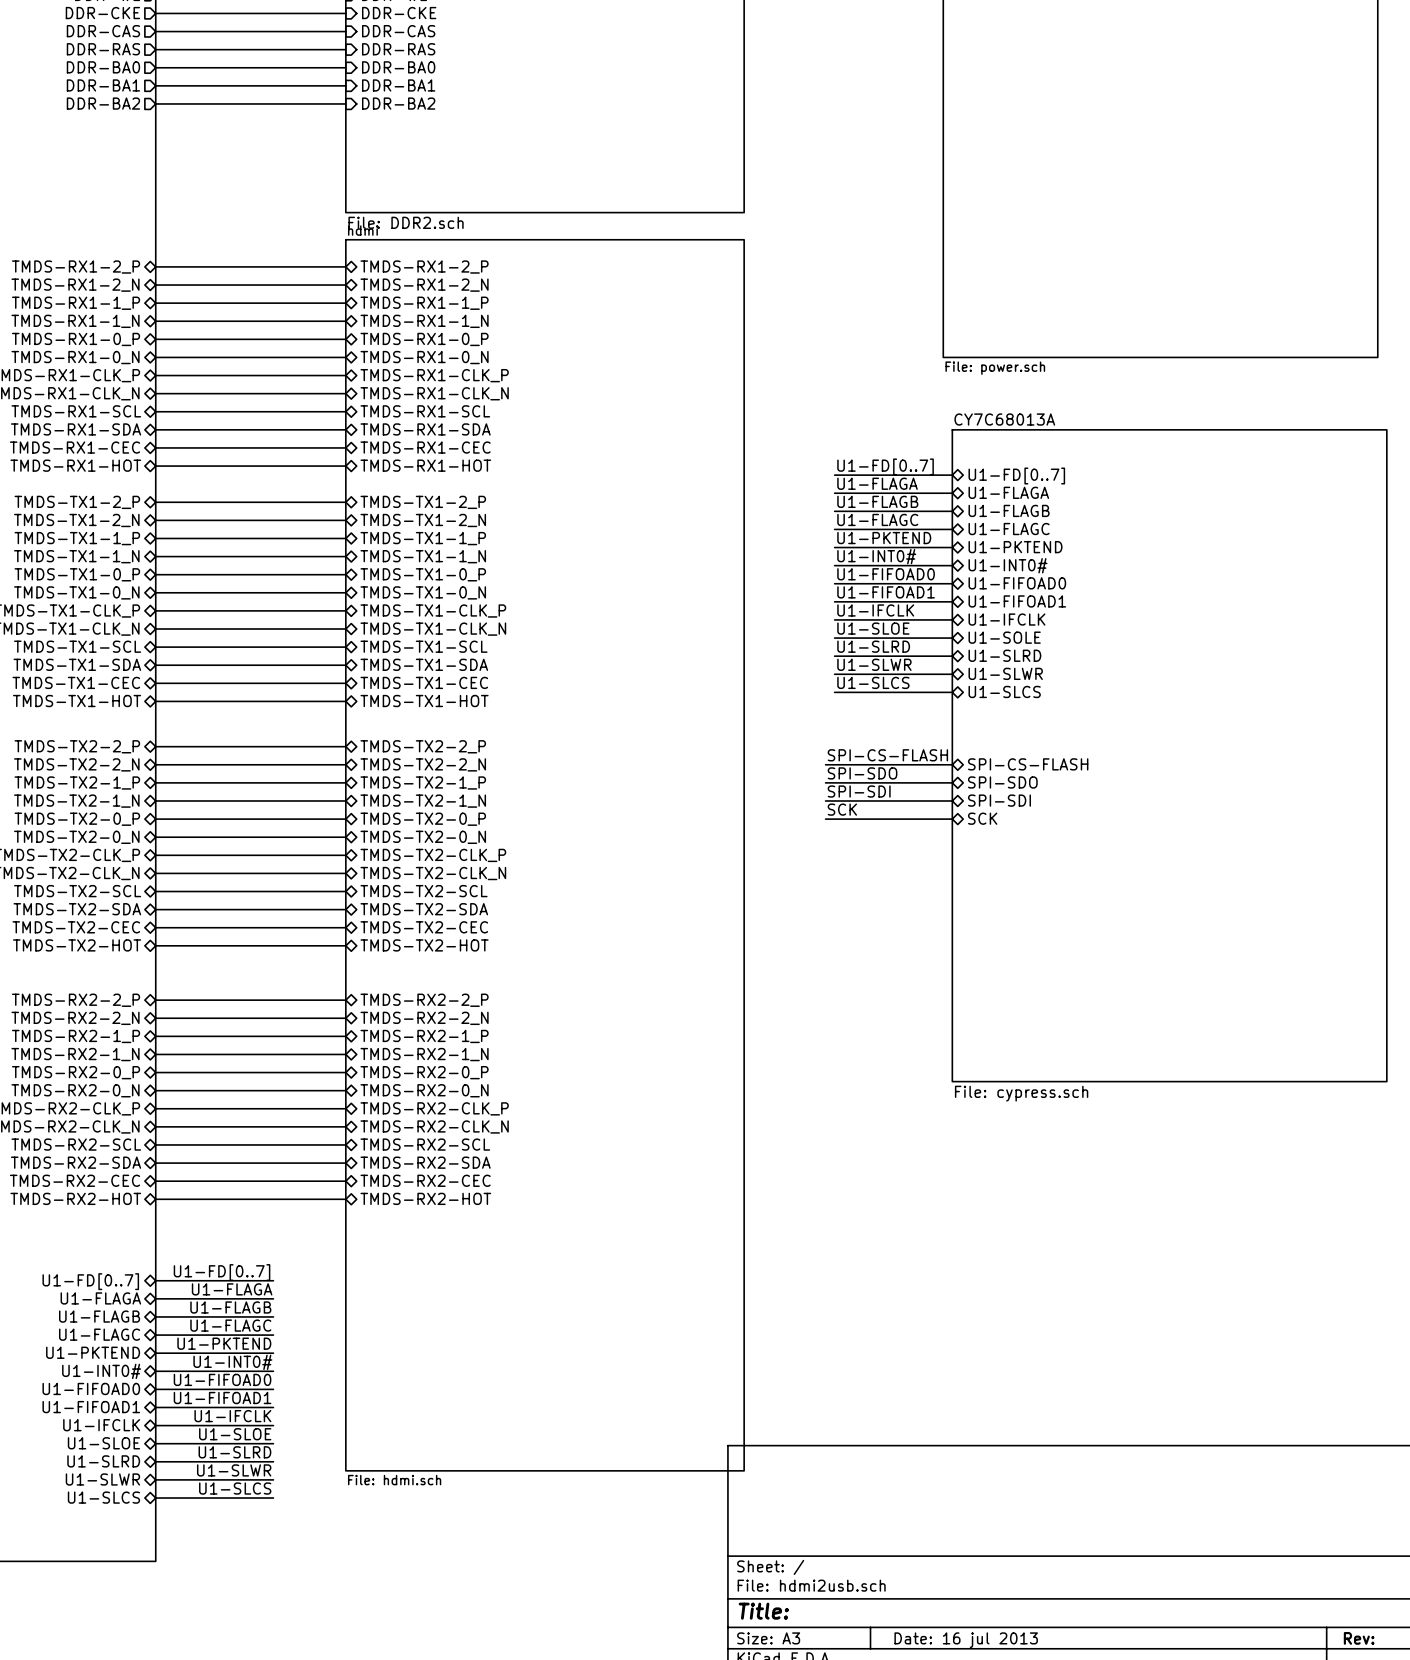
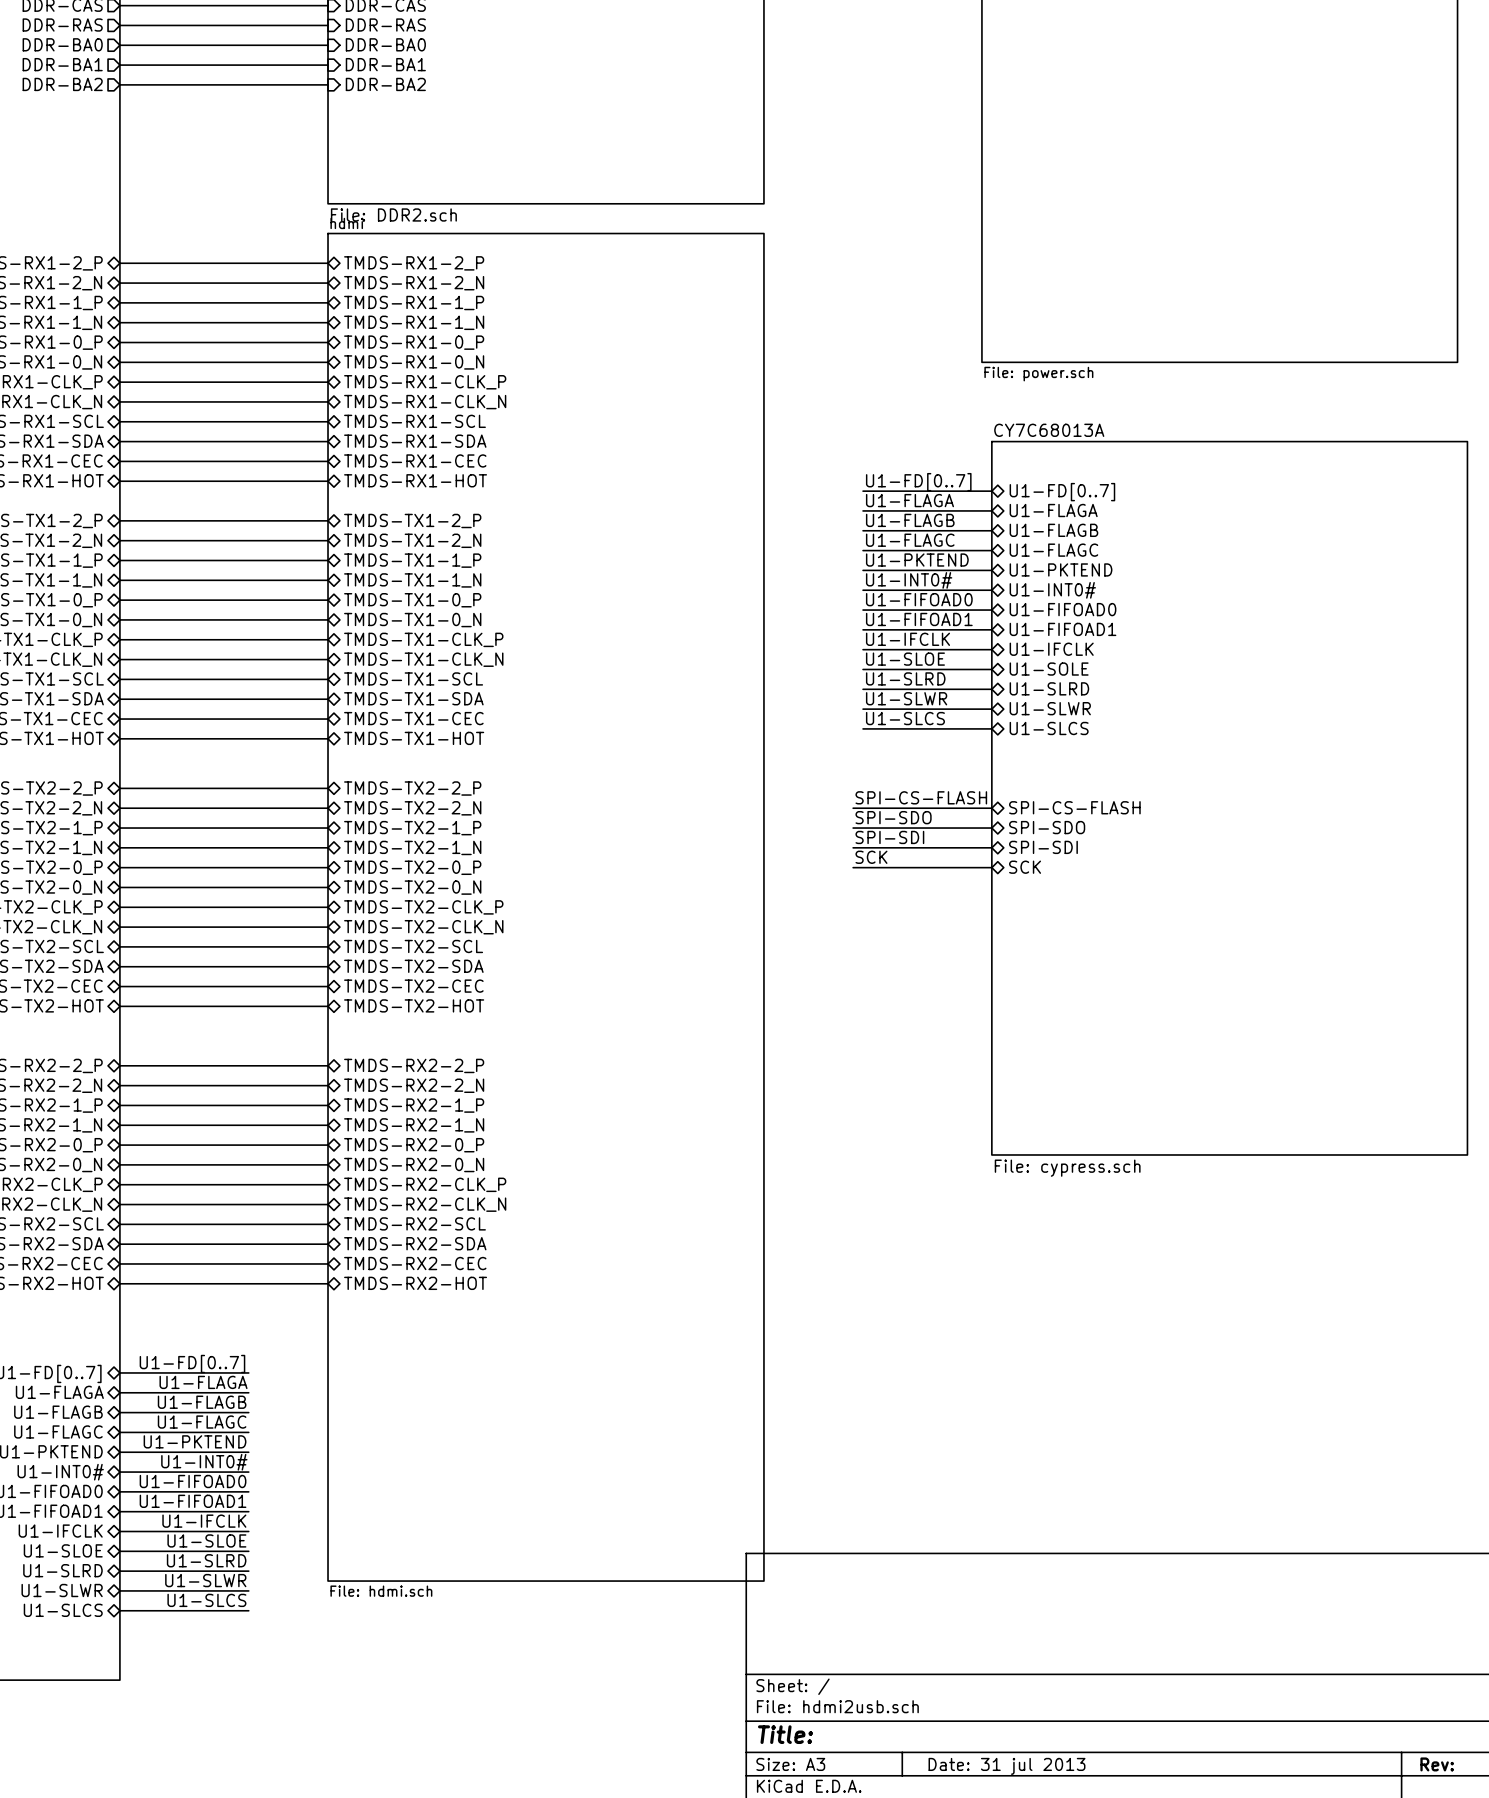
title block: Date: 16 jul 2013 (966, 1640) -> Date: 31 jul 2013 (1007, 1766)

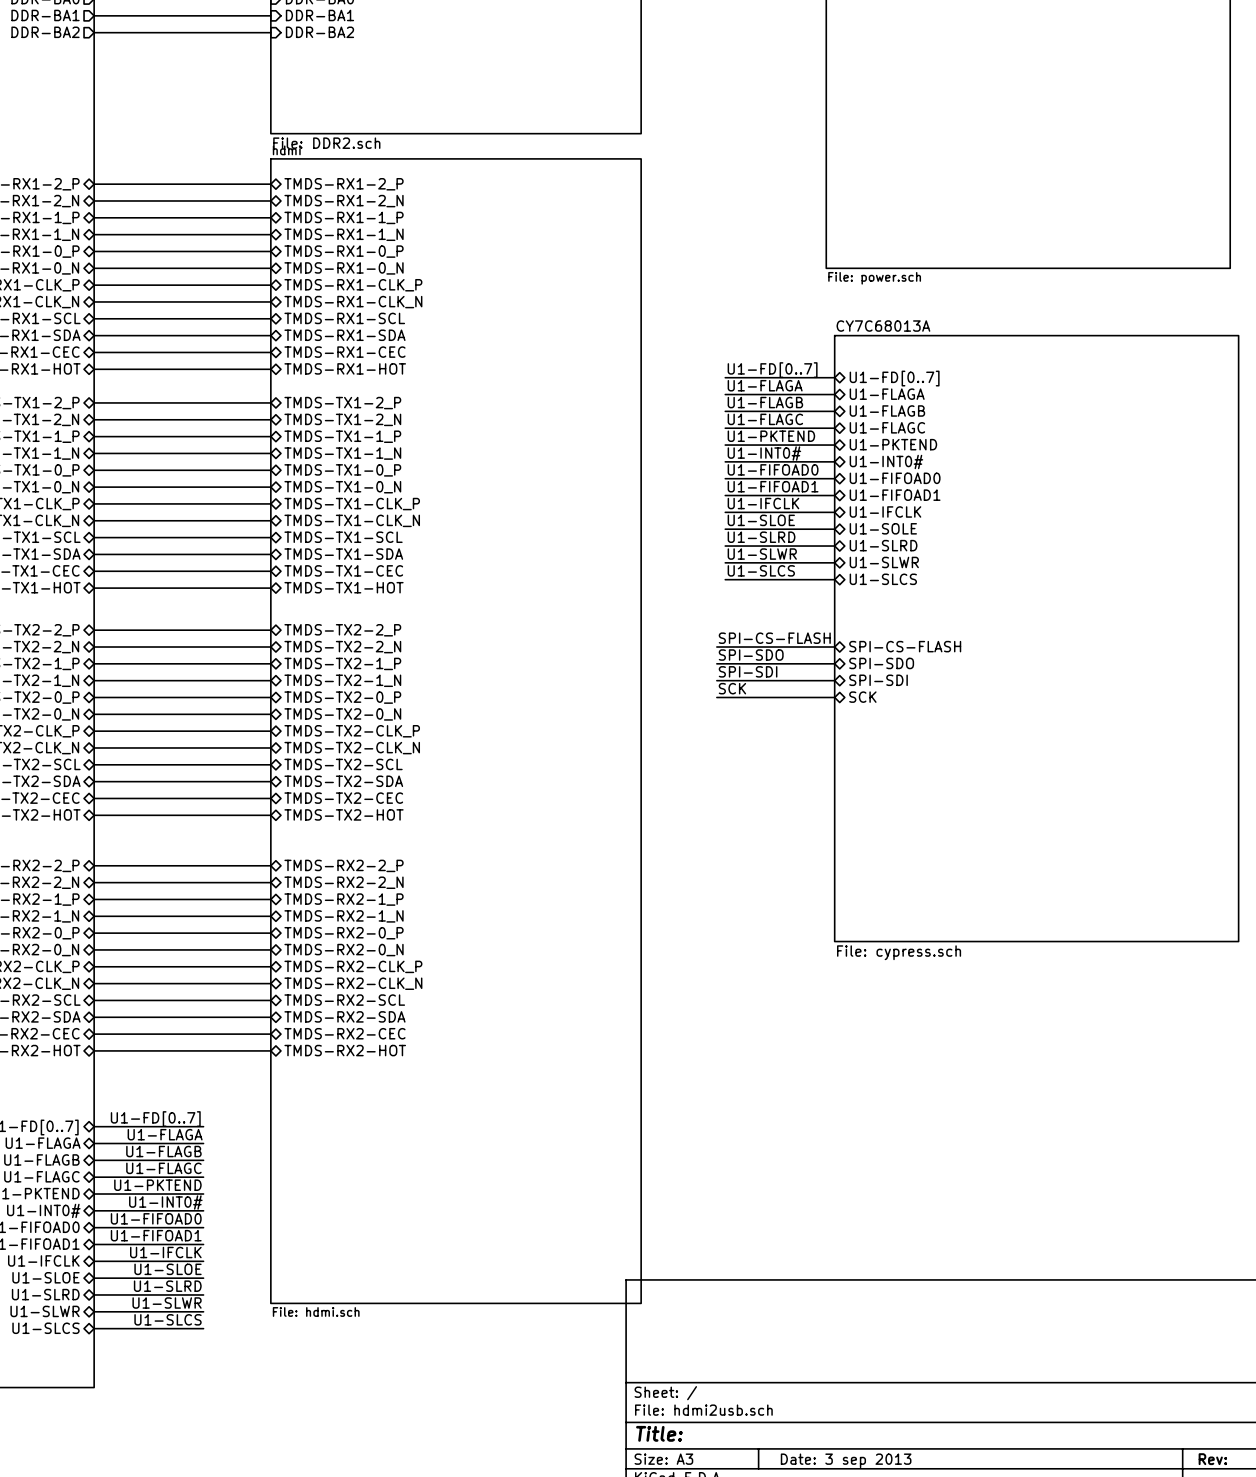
title block: Date: 31 jul 2013 (1007, 1766) -> Date: 3 sep 2013 (846, 1460)

